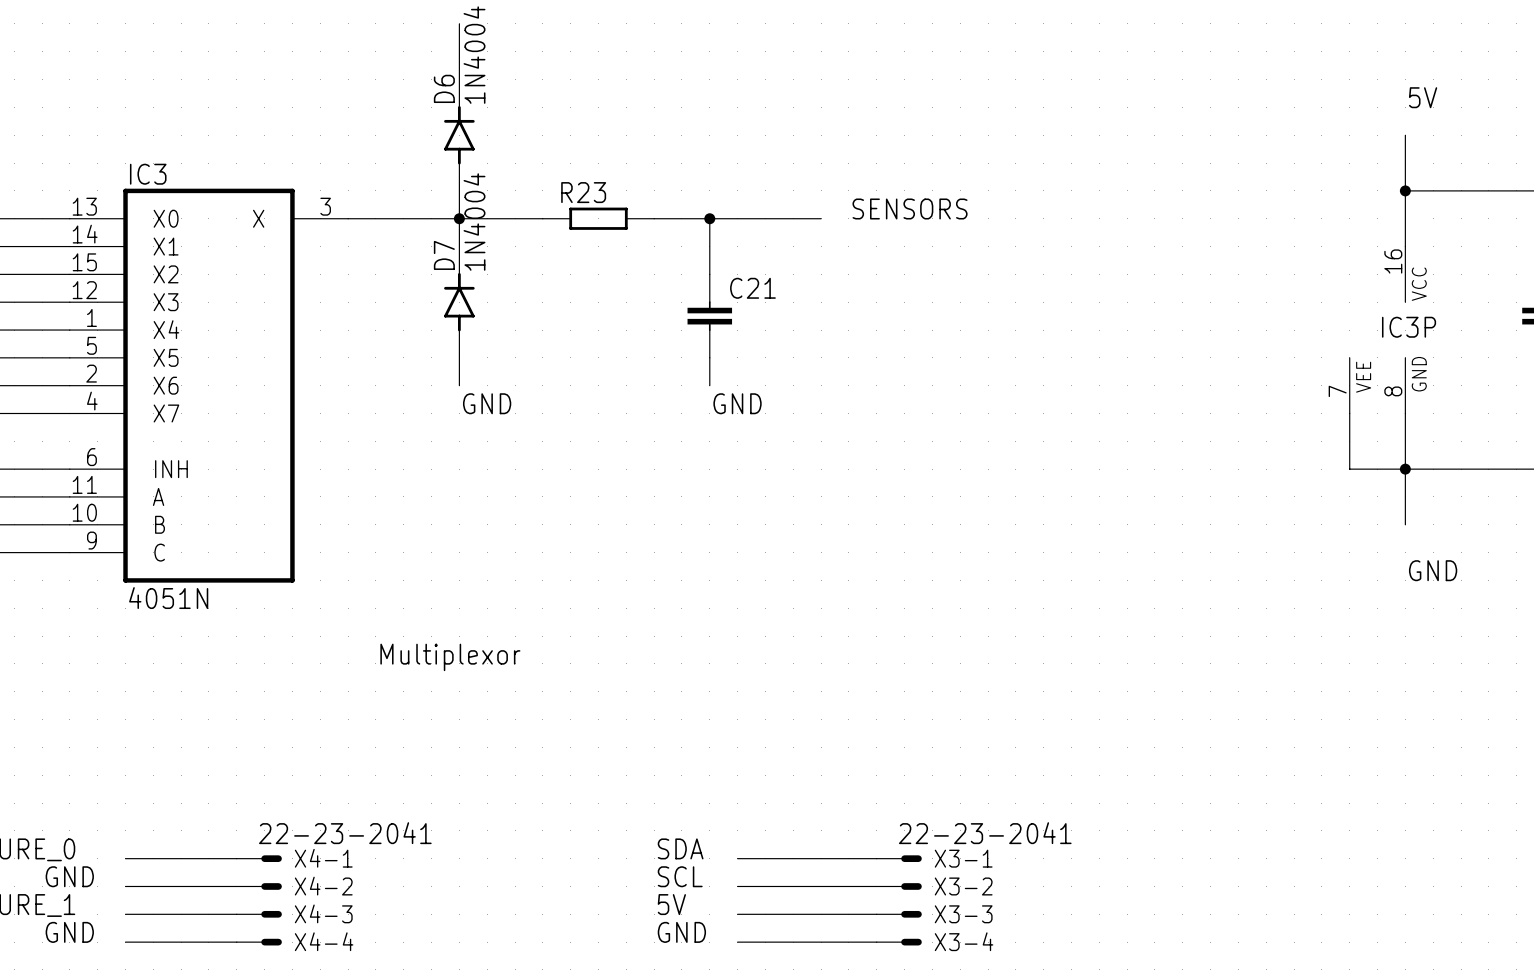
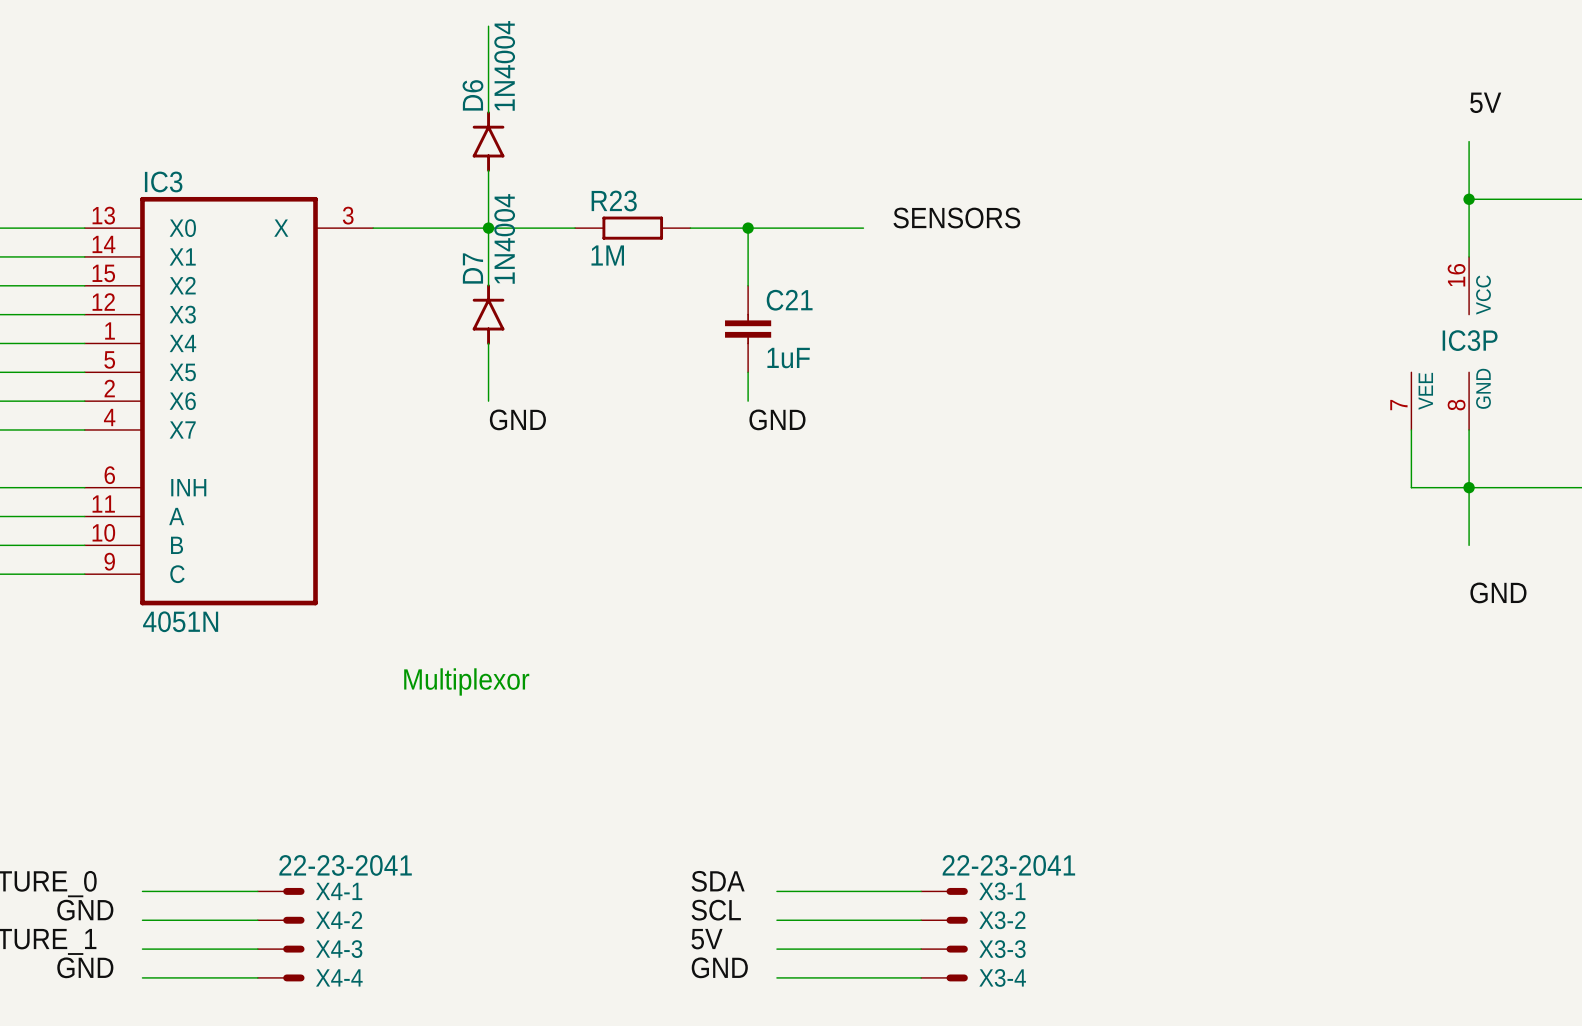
R23 value: none -> 1M (607, 255)
C21 value: none -> 1uF (788, 358)

